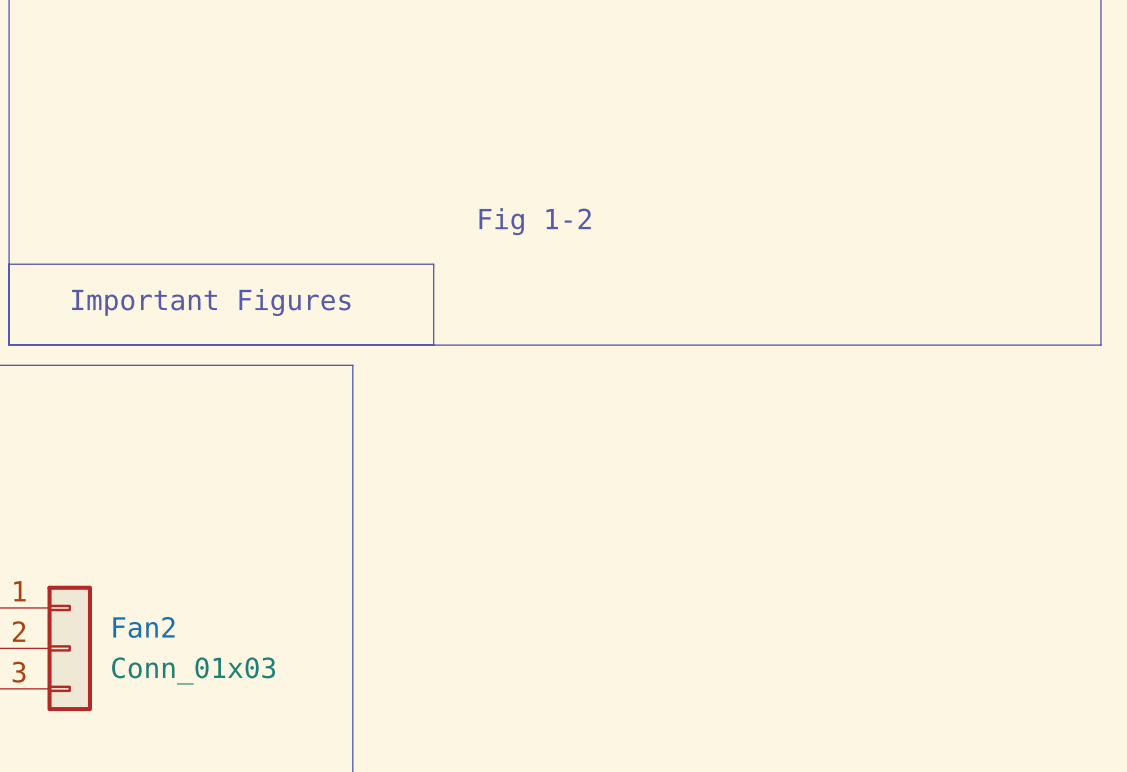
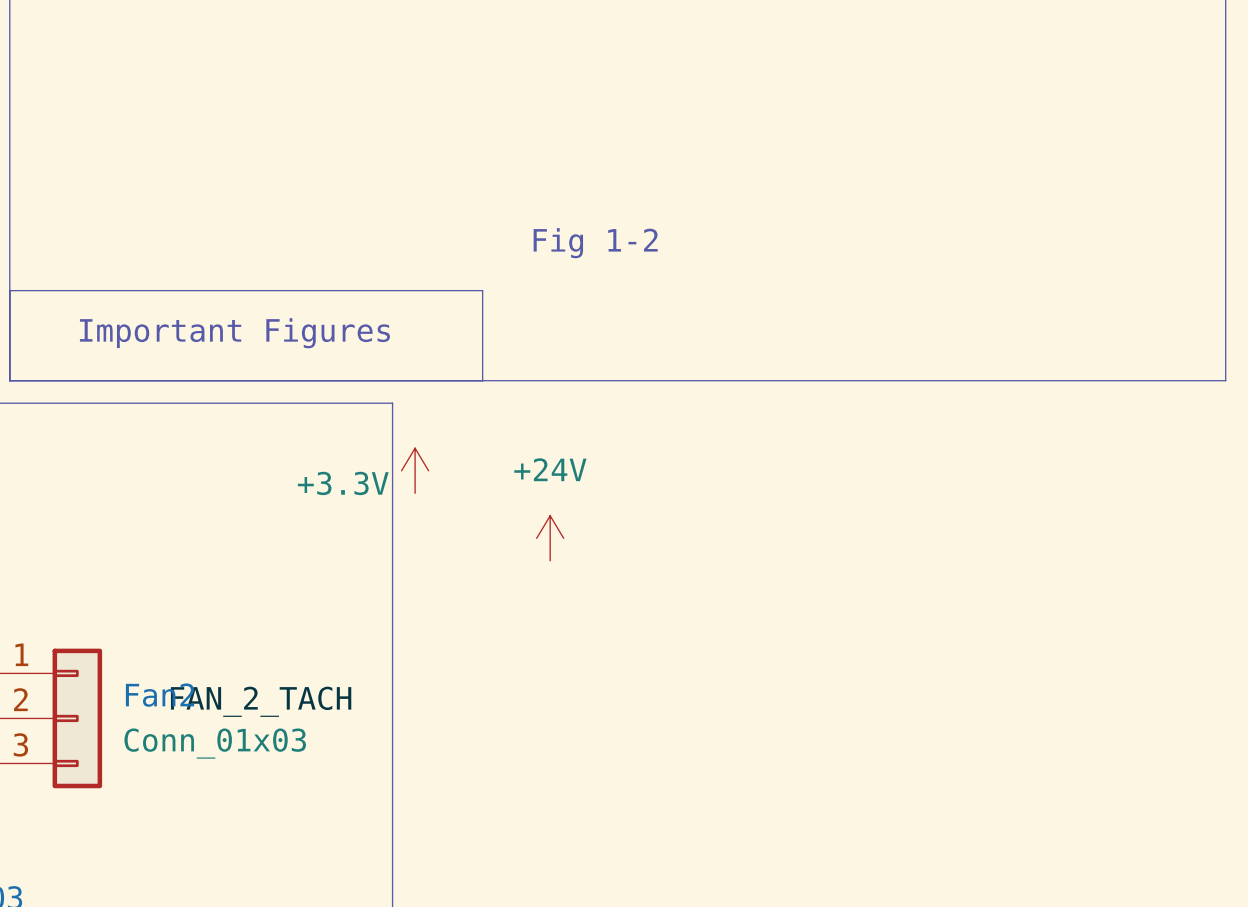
power symbol: none -> +3.3V (415, 470)
power symbol: none -> +24V (550, 538)
label: none -> FAN_2_TACH (261, 701)

